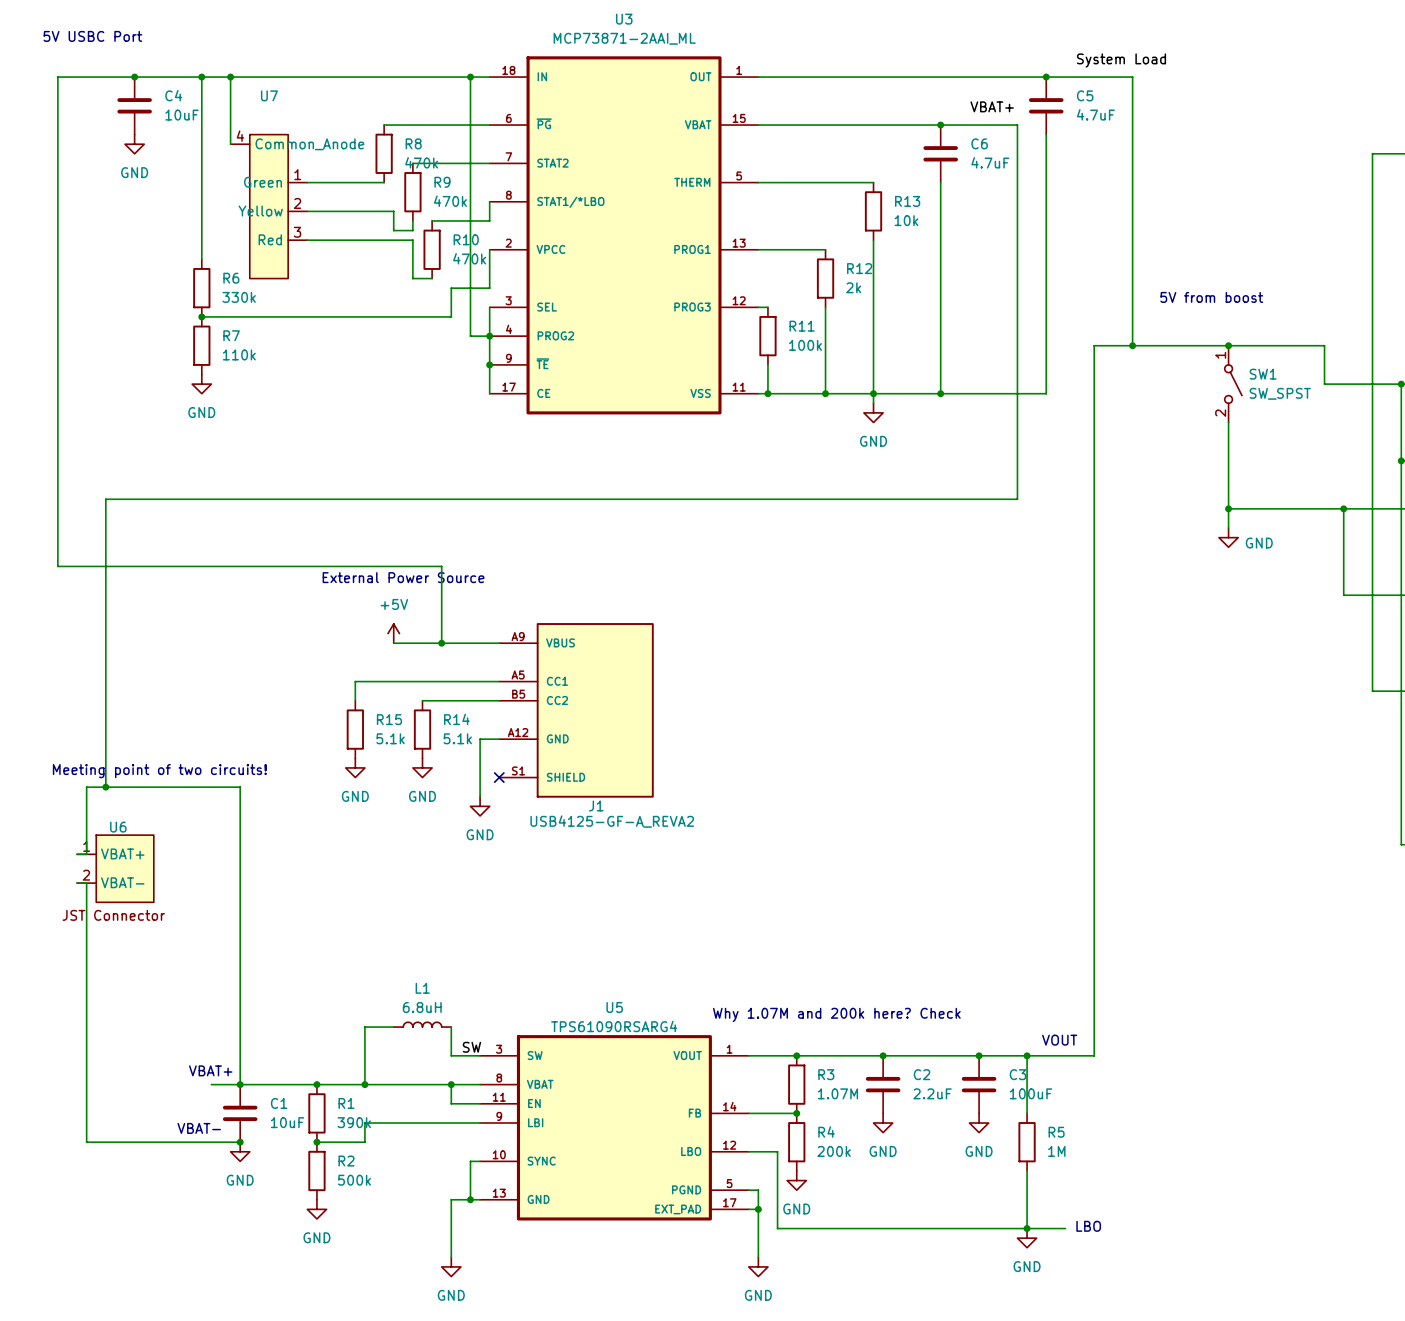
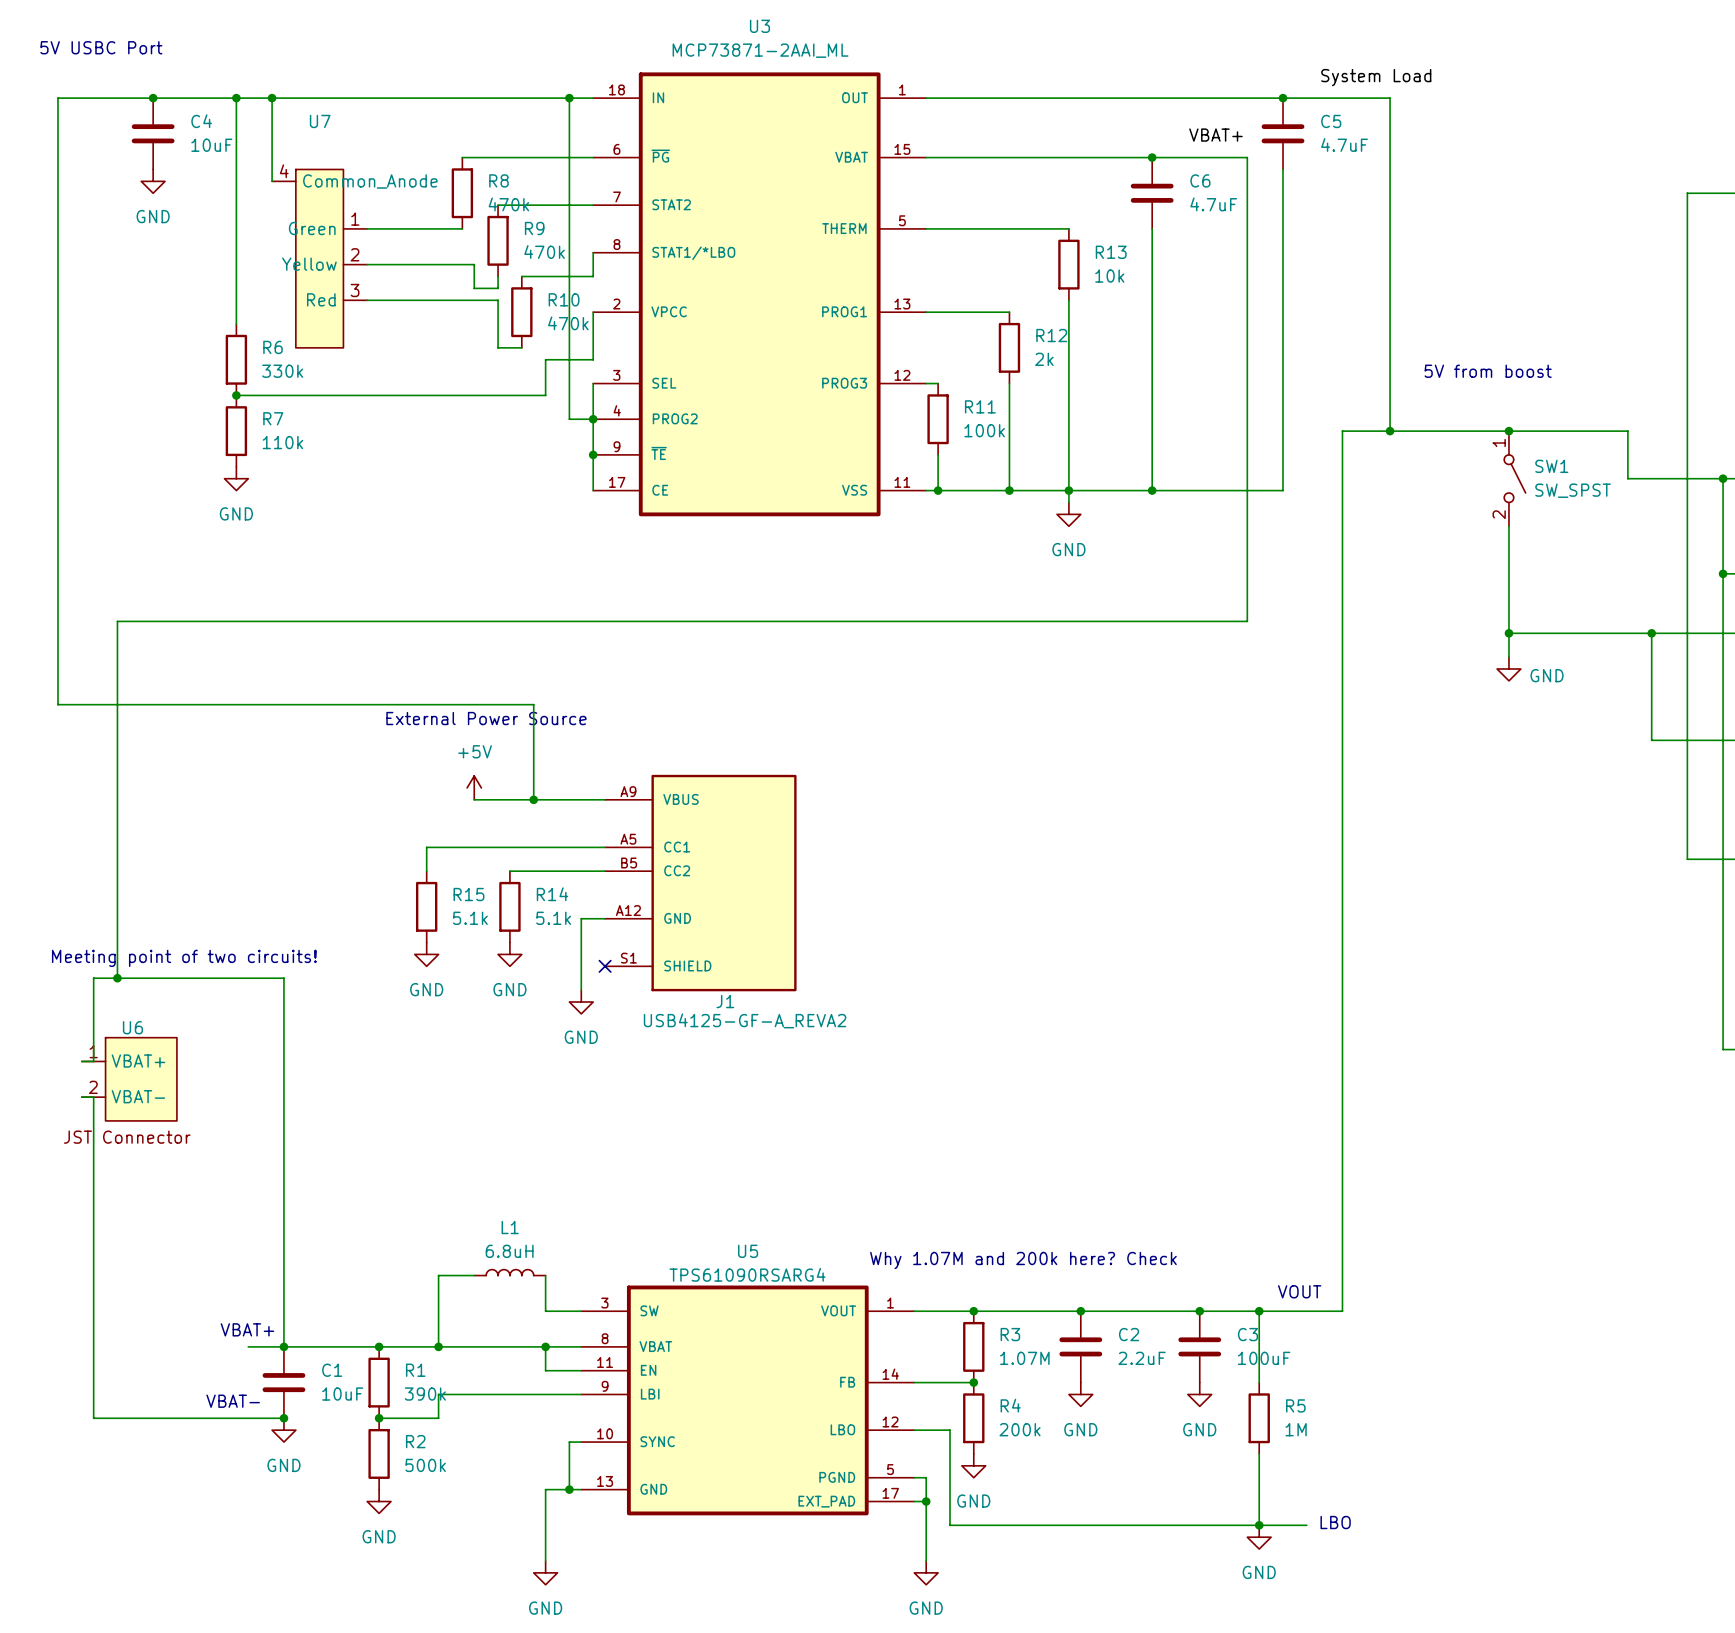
label: SW (471, 1047) -> none

